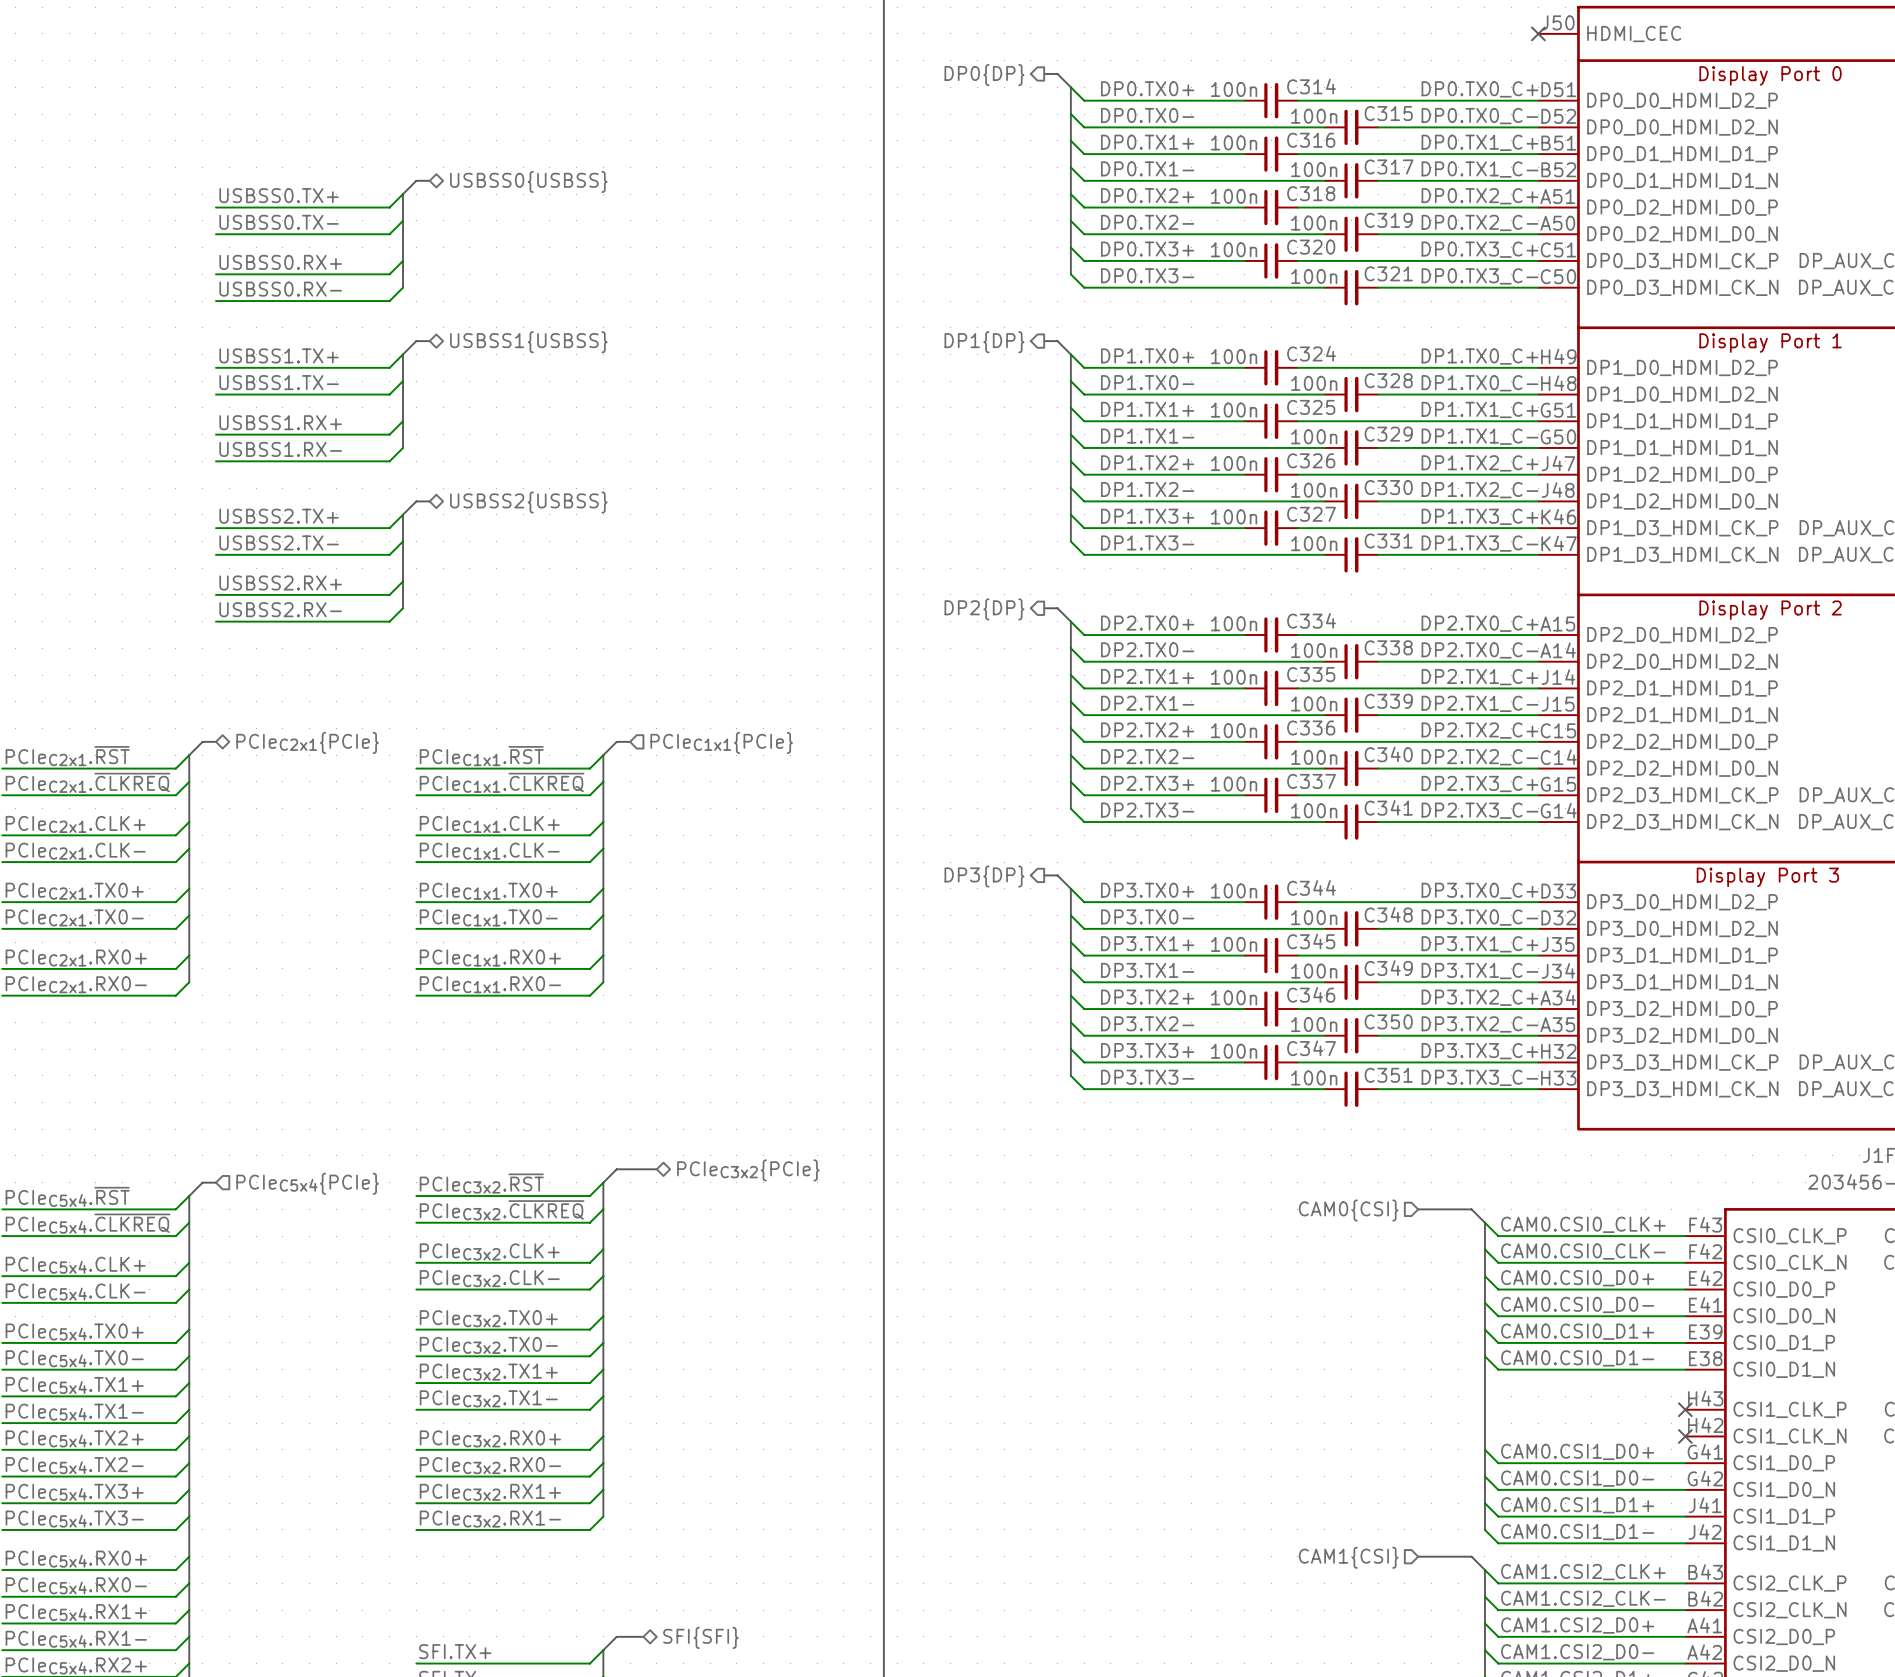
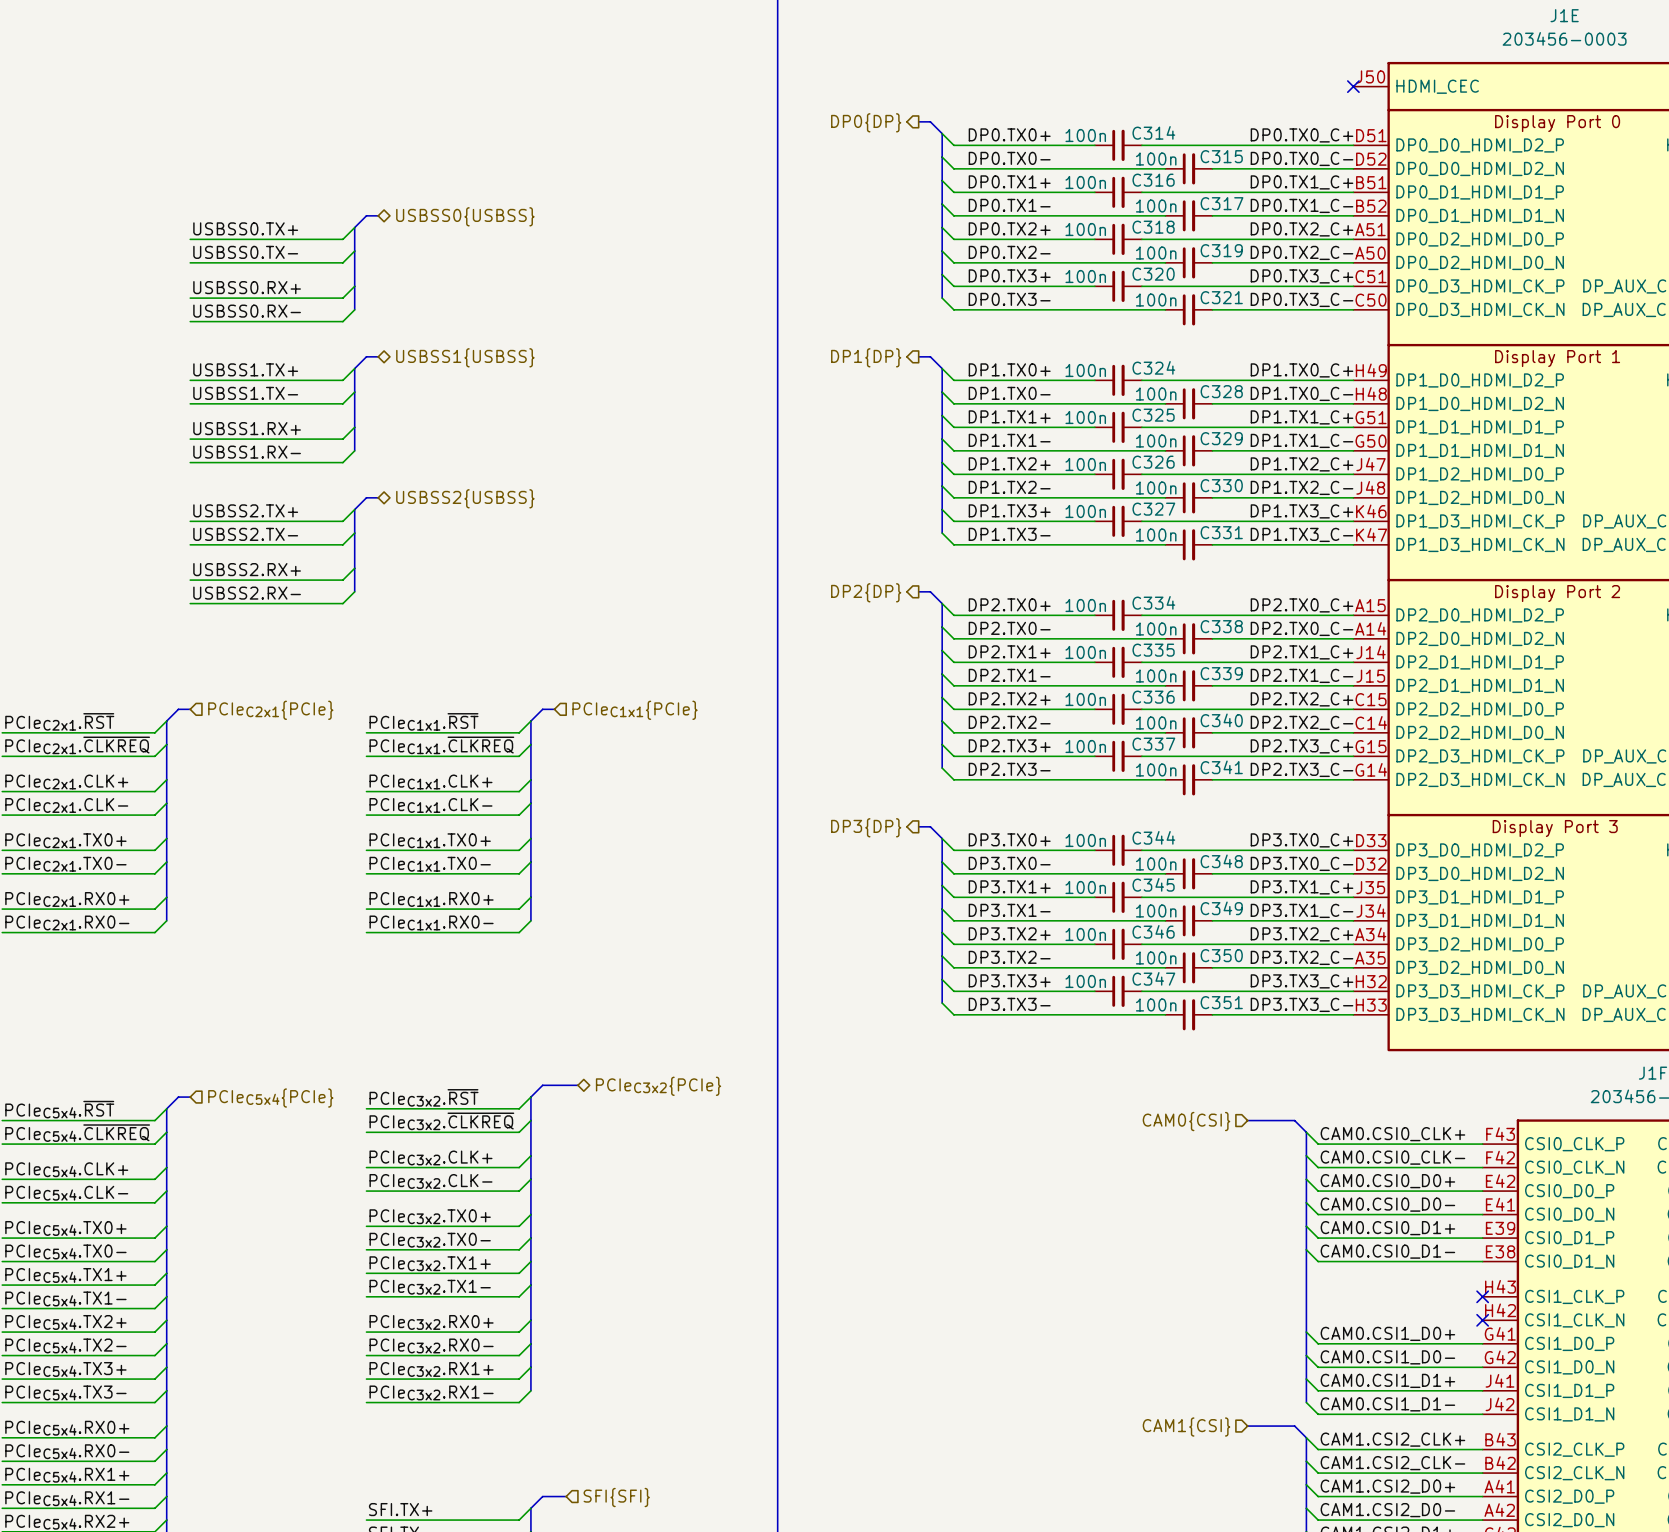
hierarchical label shape: bidirectional (307, 742) -> input (270, 710)
hierarchical label shape: bidirectional (700, 1637) -> input (616, 1497)

